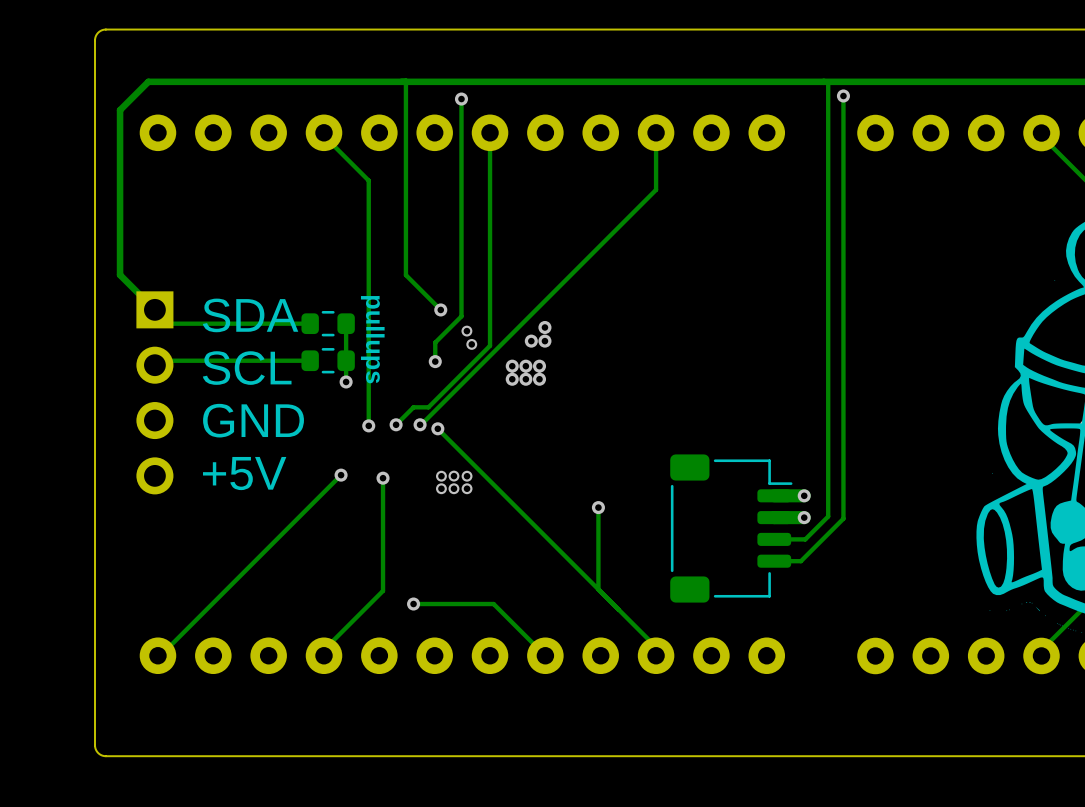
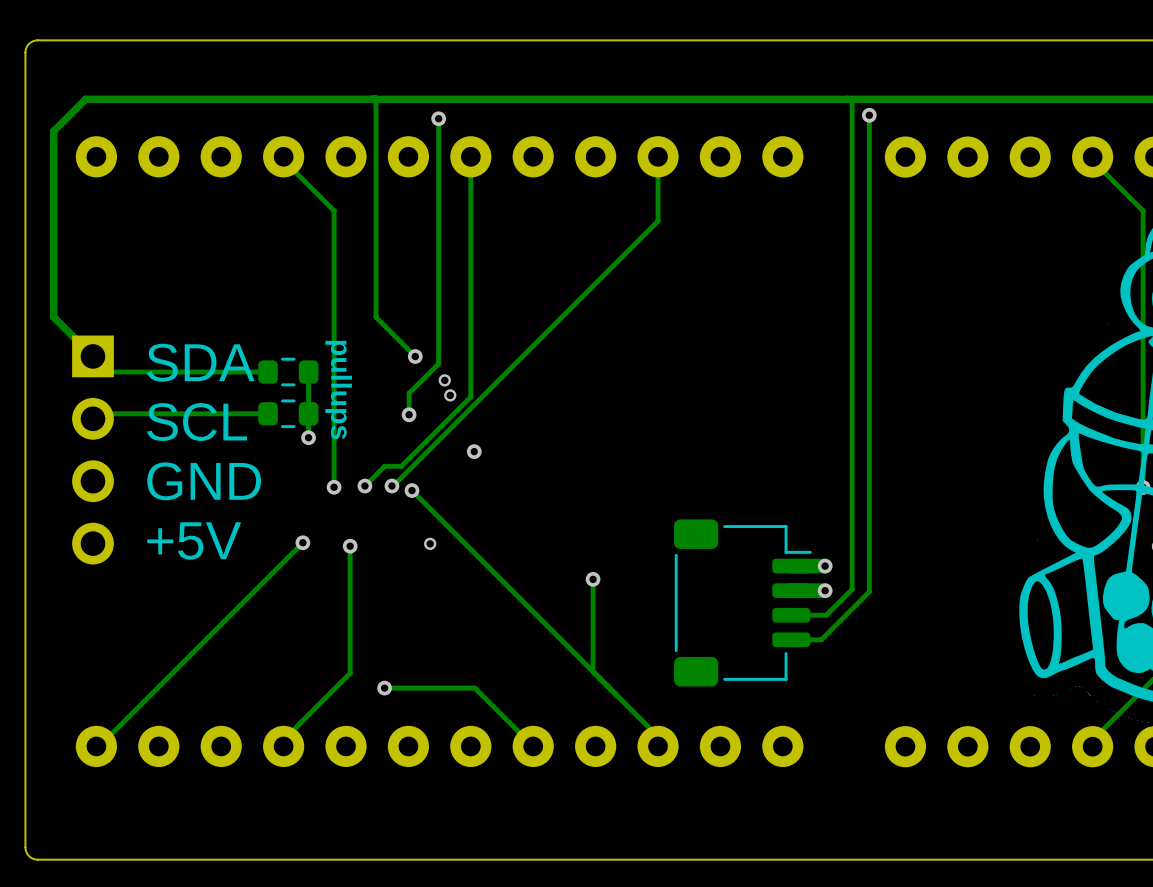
via: (544, 327) -> none
via: (531, 341) -> none
via: (544, 341) -> none
via: (512, 366) -> none
via: (525, 366) -> none
via: (539, 366) -> none
via: (512, 379) -> none
via: (525, 379) -> none
via: (539, 379) -> none
via: none -> (474, 451)
via: (441, 476) -> none
via: (467, 476) -> none
via: (441, 488) -> none
via: (453, 488) -> none
via: (467, 488) -> none

